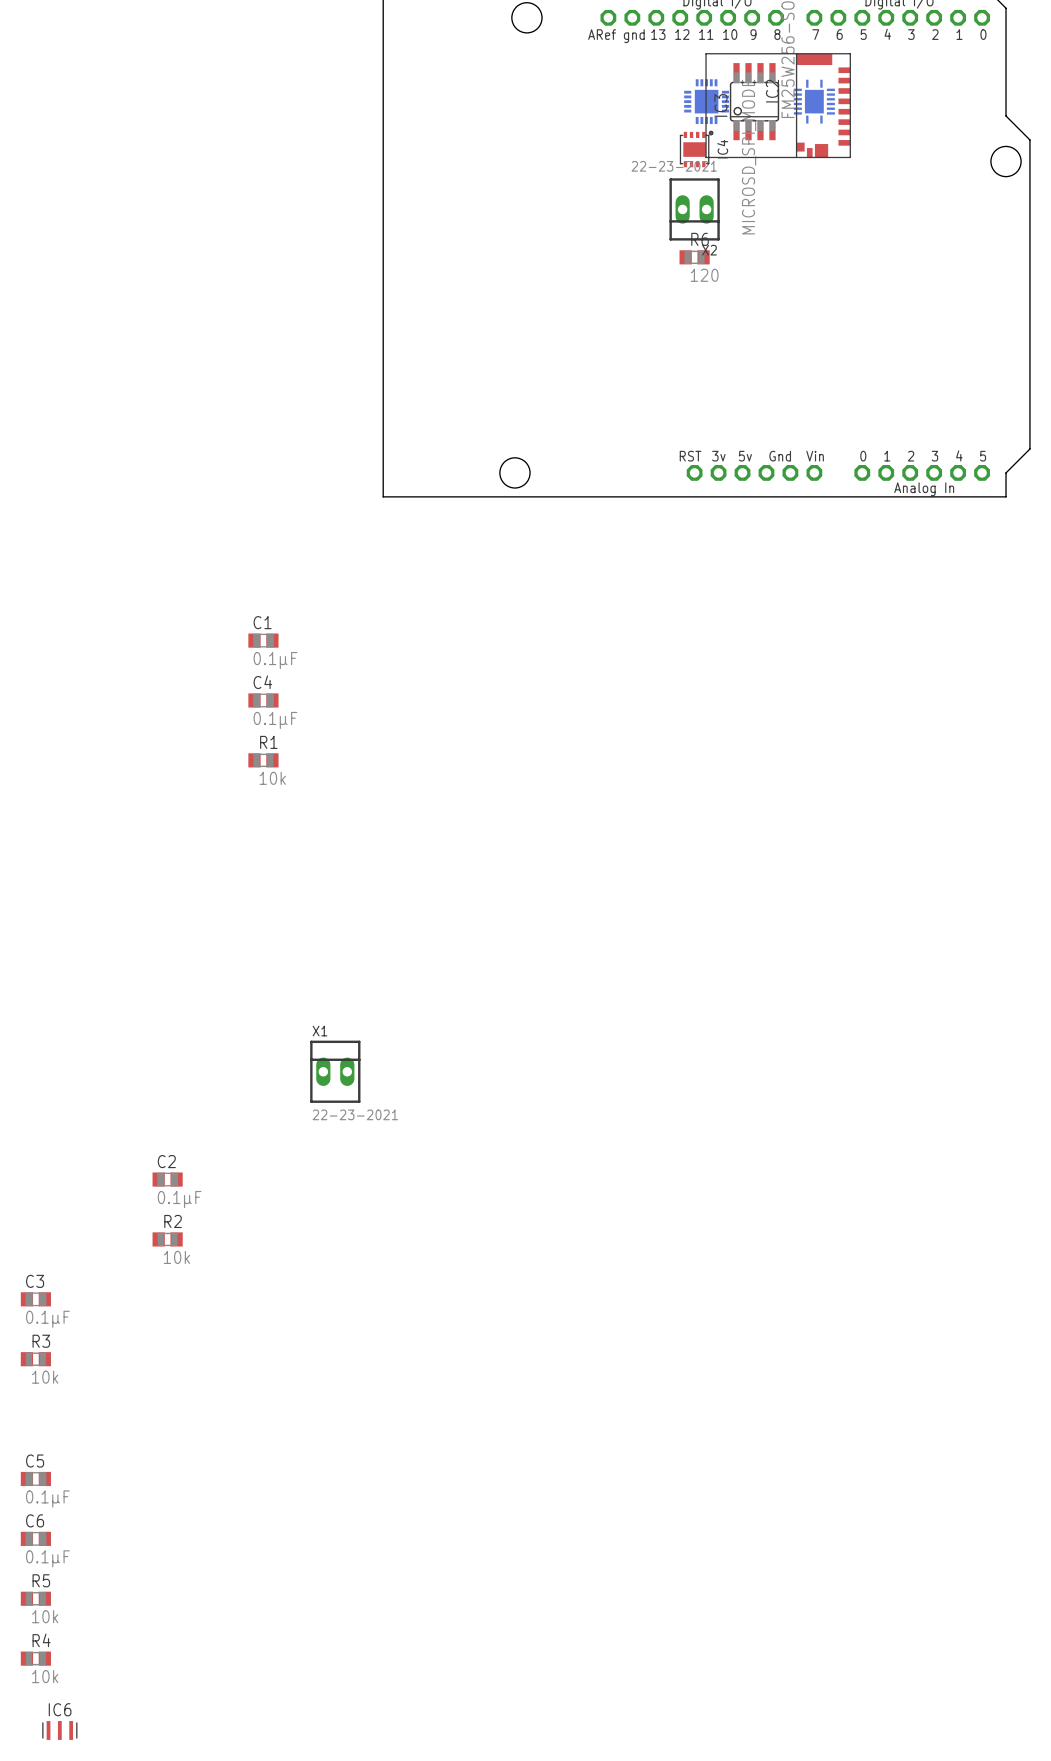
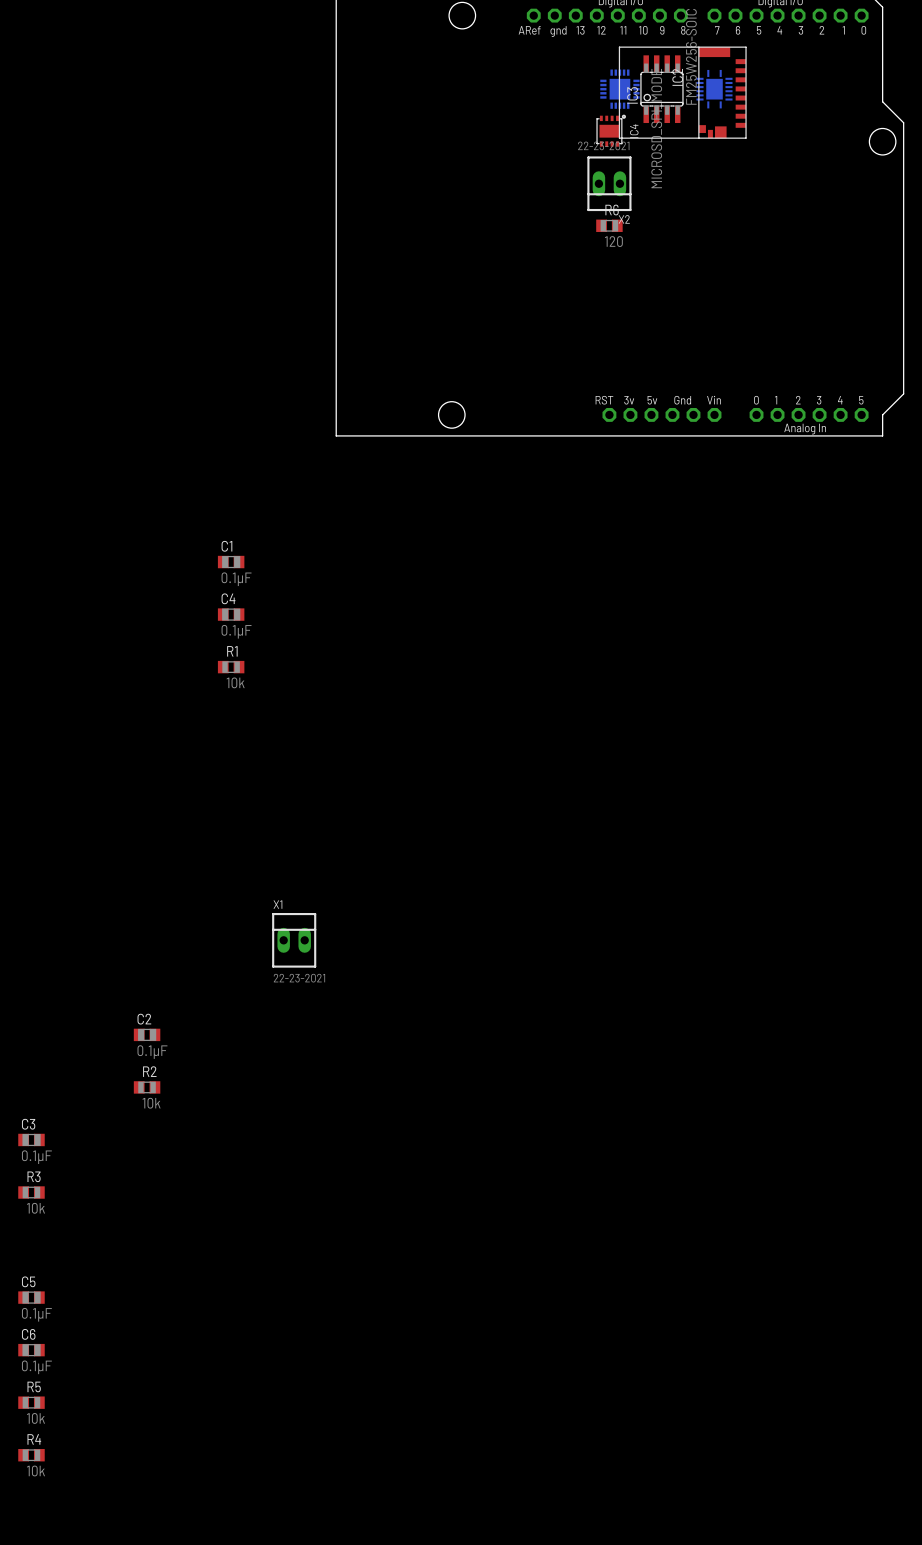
IC6: (59, 1730) -> none

